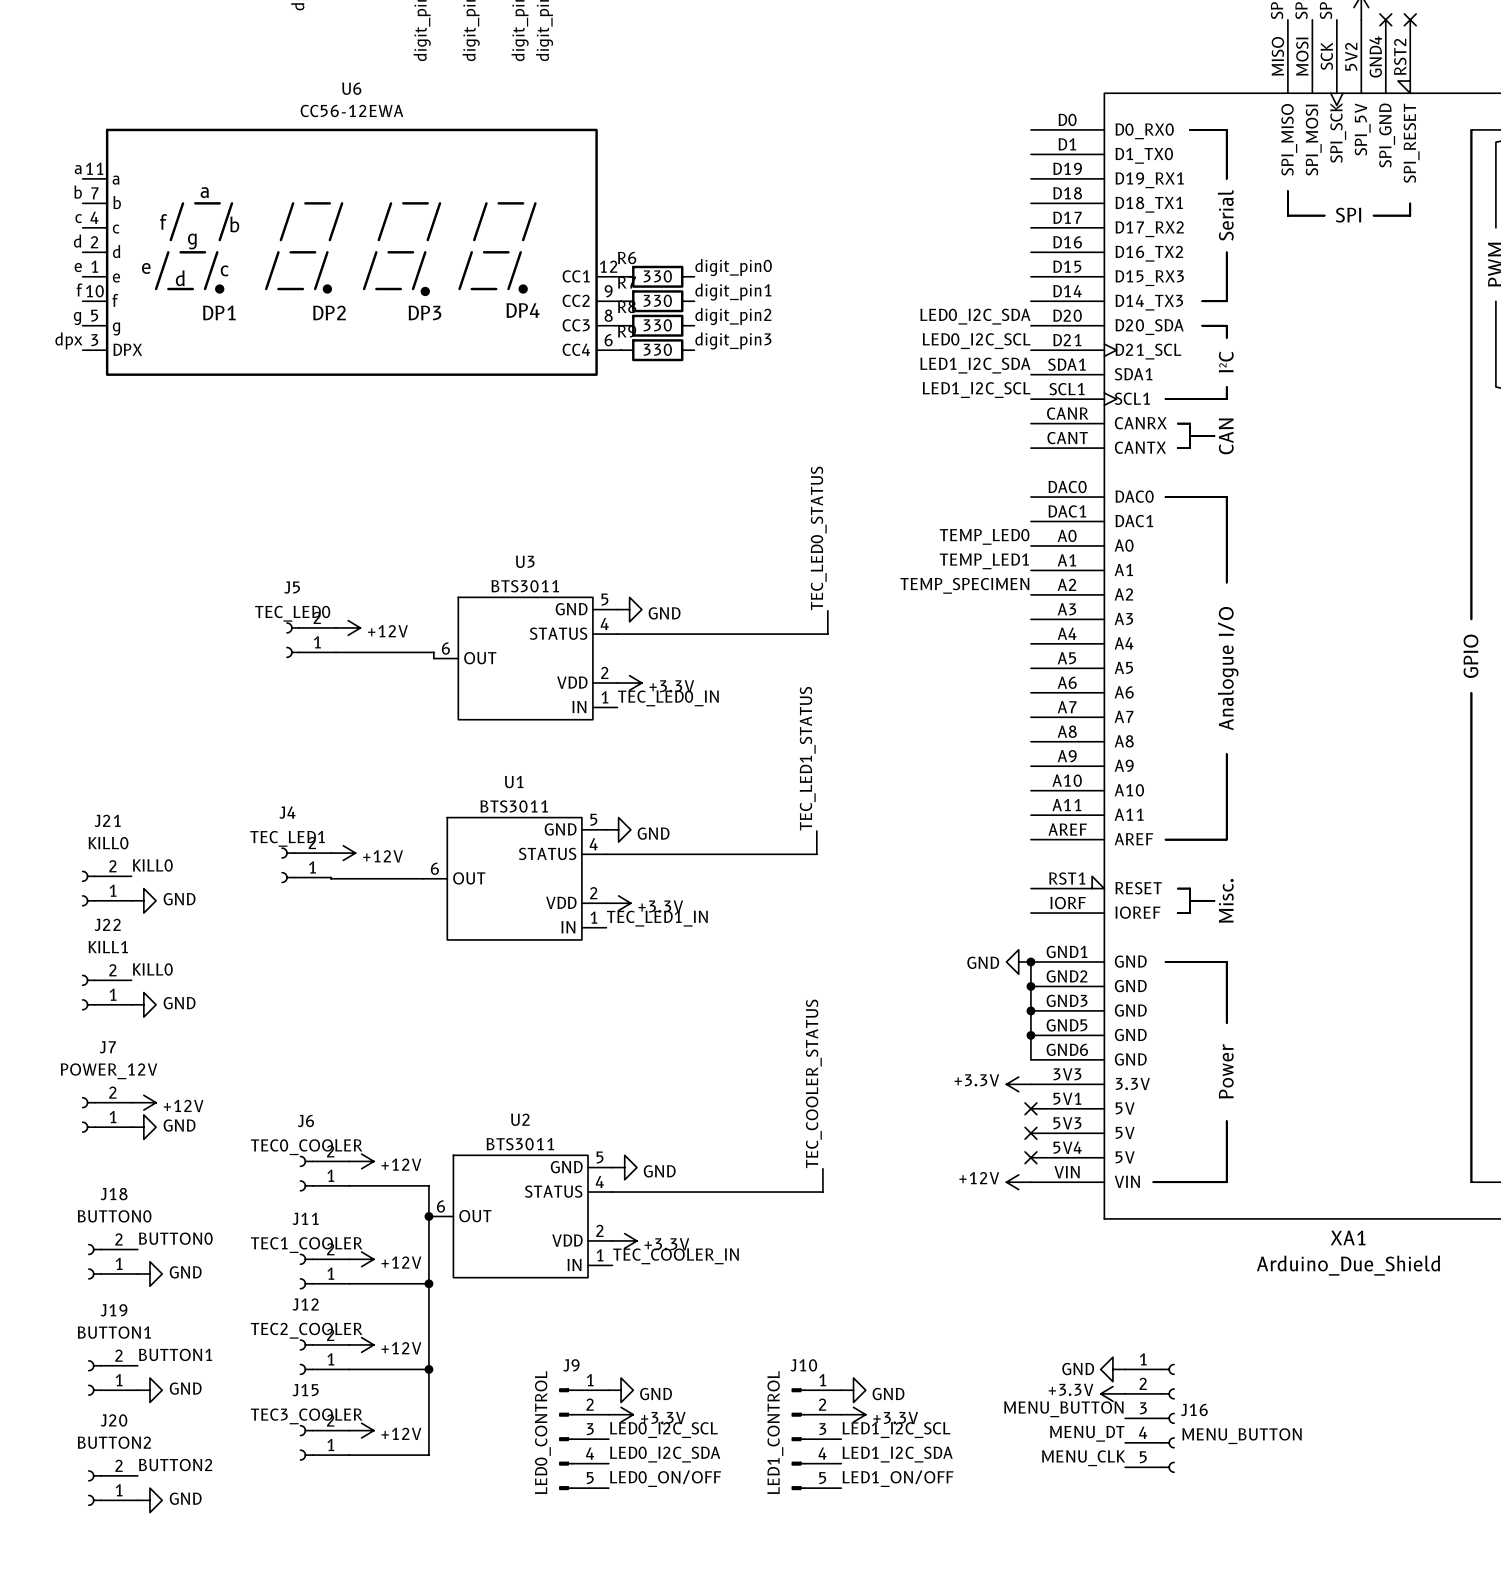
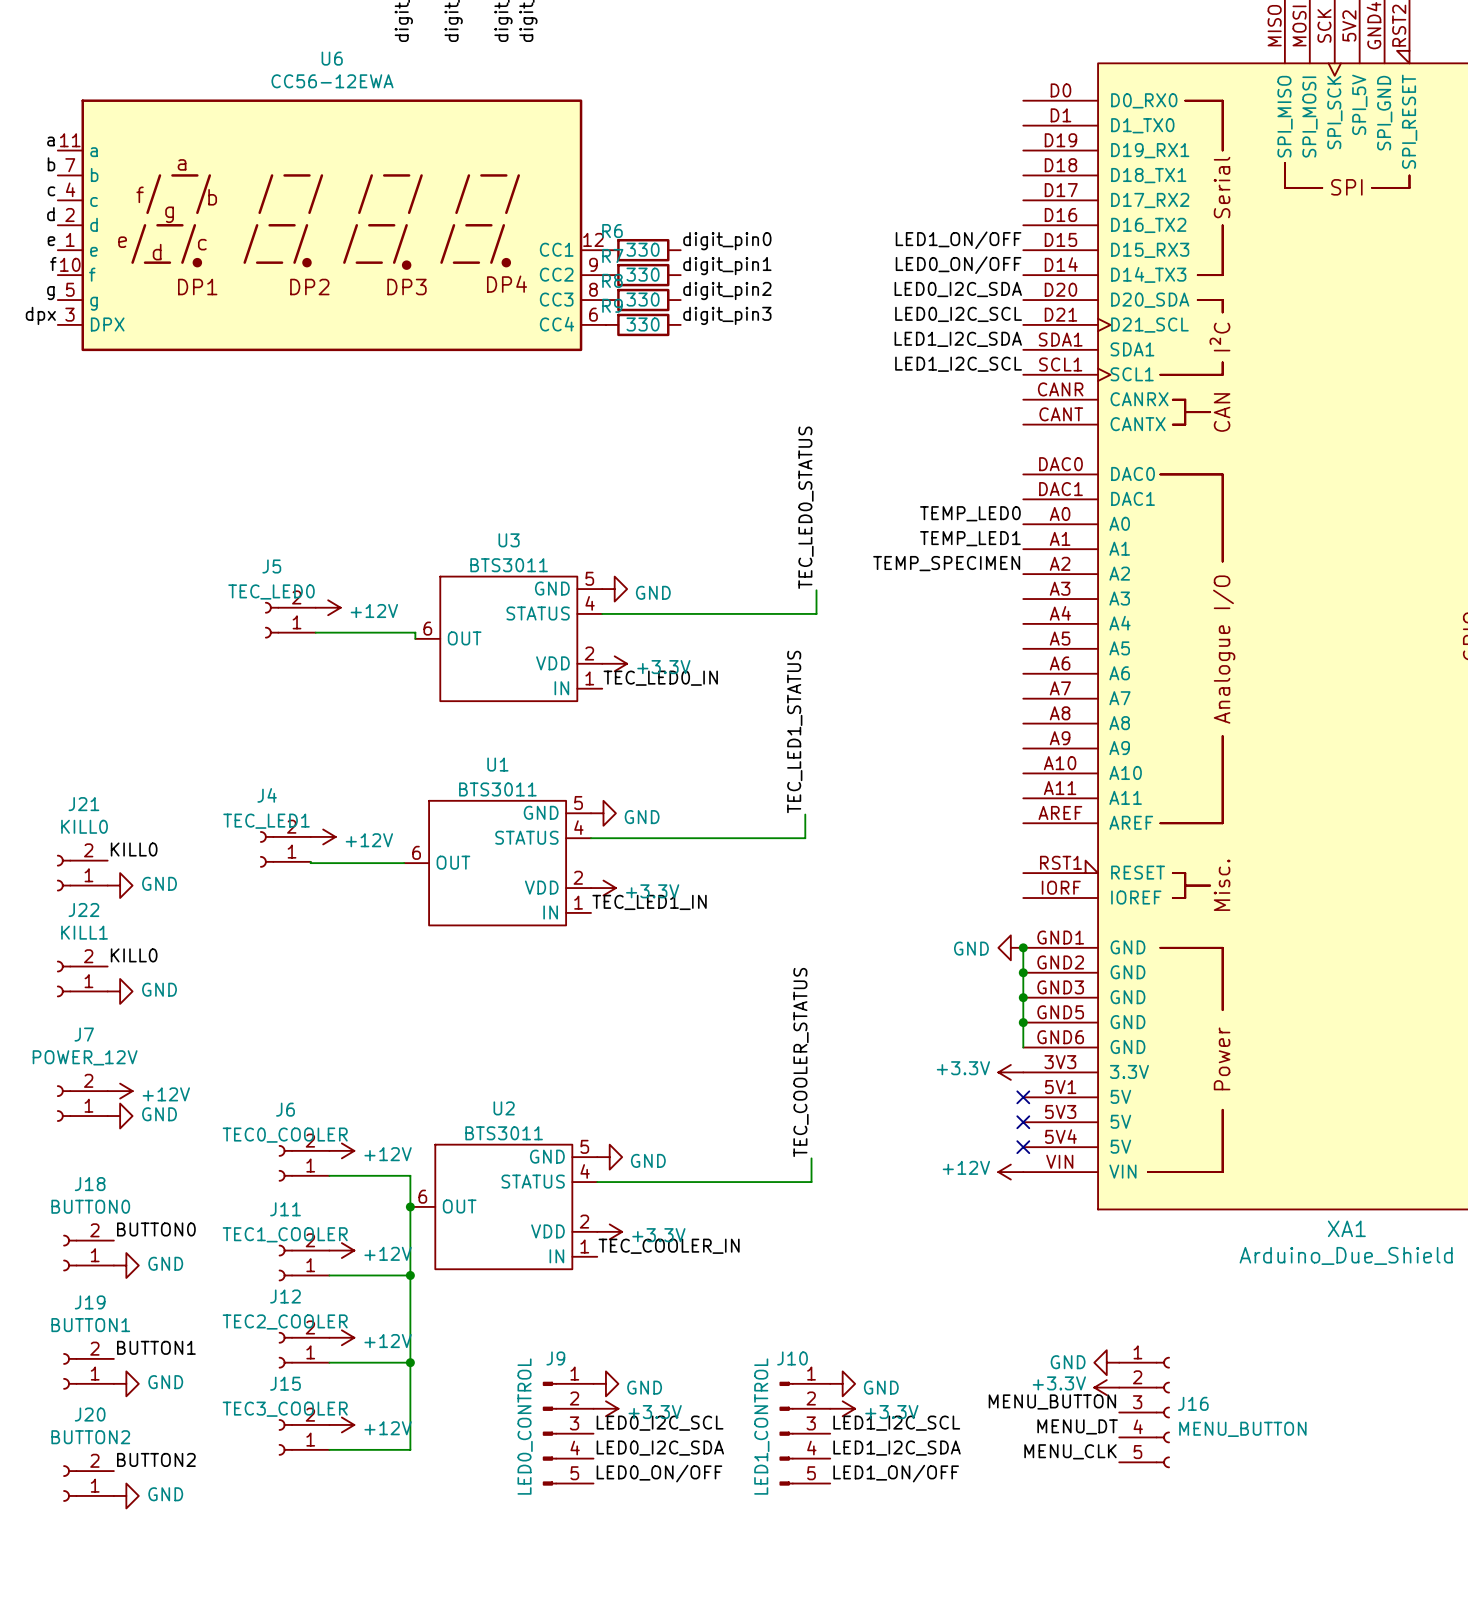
label: none -> LED1_ON/OFF (958, 240)
label: none -> LED0_ON/OFF (958, 265)

